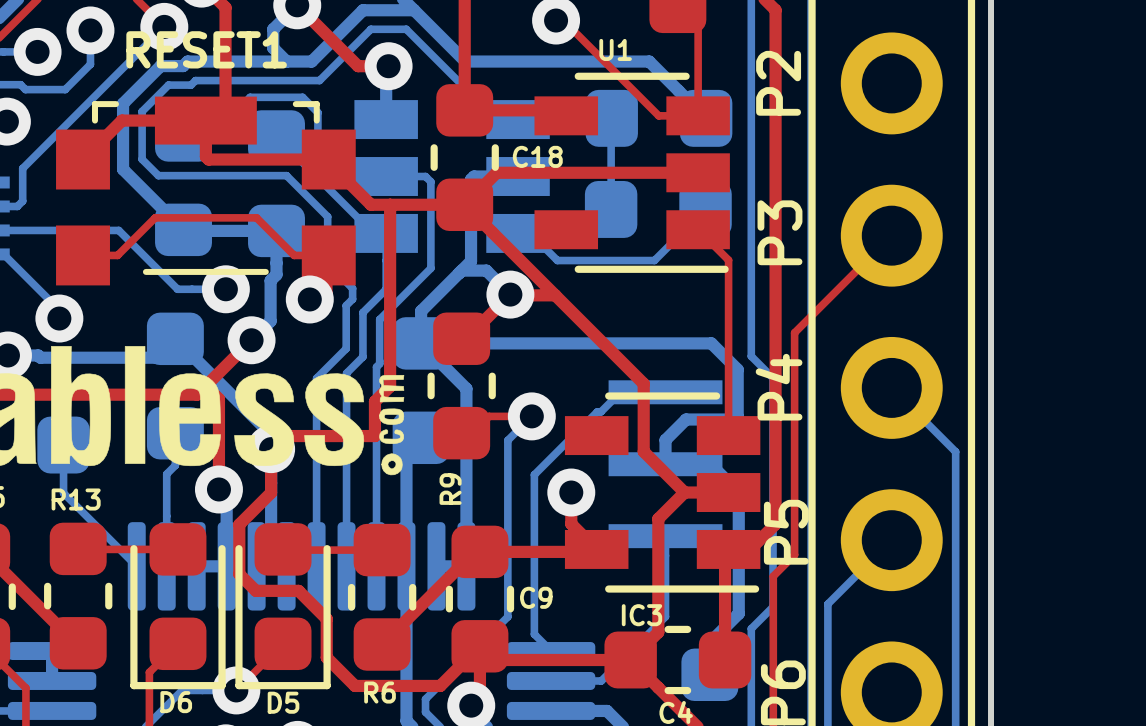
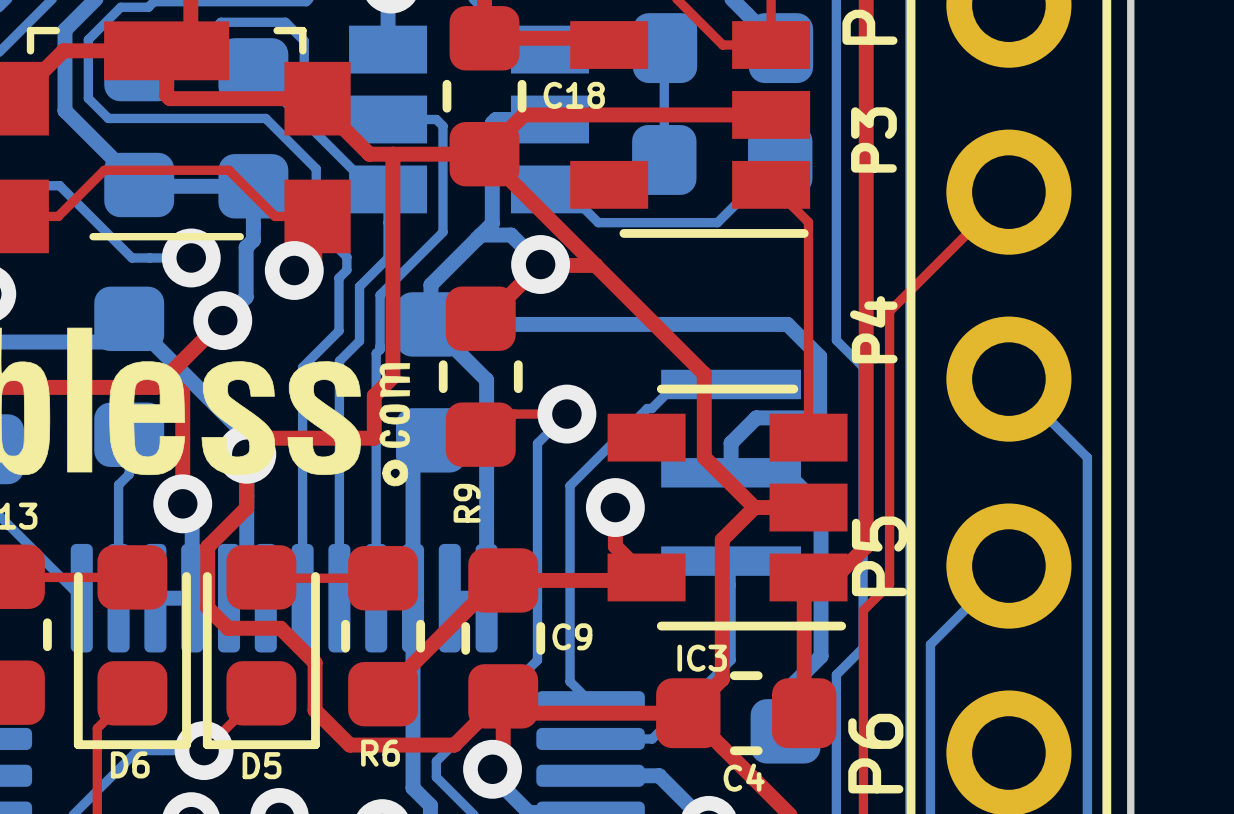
text position: P3 (779, 232) -> P3 (873, 139)
text position: P4 (779, 387) -> P4 (873, 329)

